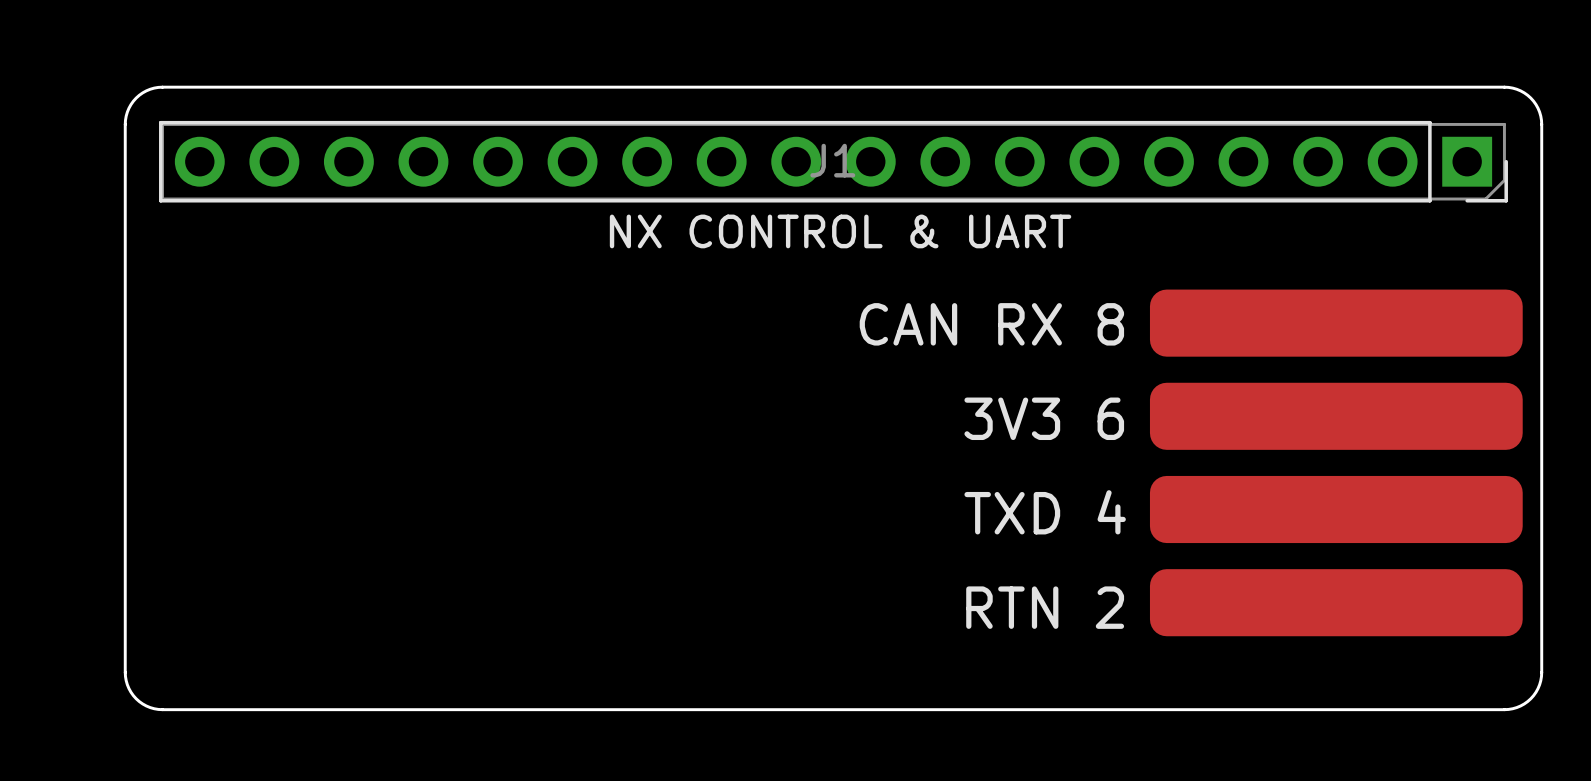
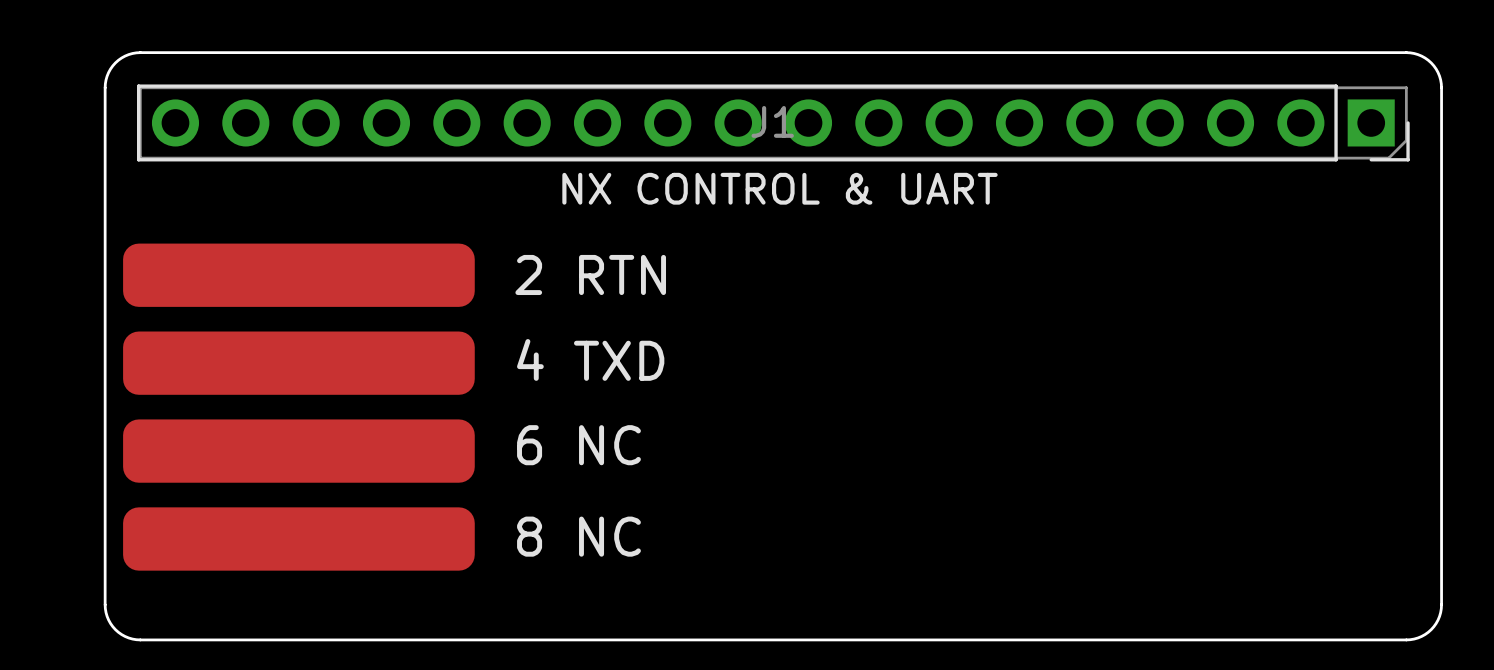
text: none -> 2 RTN (590, 274)
text: CAN RX 8 (991, 324) -> none
text: none -> 4 TXD (590, 359)
text: 3V3 6 (1044, 418) -> none
part: none -> (298, 407)
part: (1336, 462) -> none
text: none -> 6 NC (578, 445)
text: TXD 4 (1045, 512) -> none
text: none -> 8 NC (578, 536)
text: RTN 2 (1045, 607) -> none

